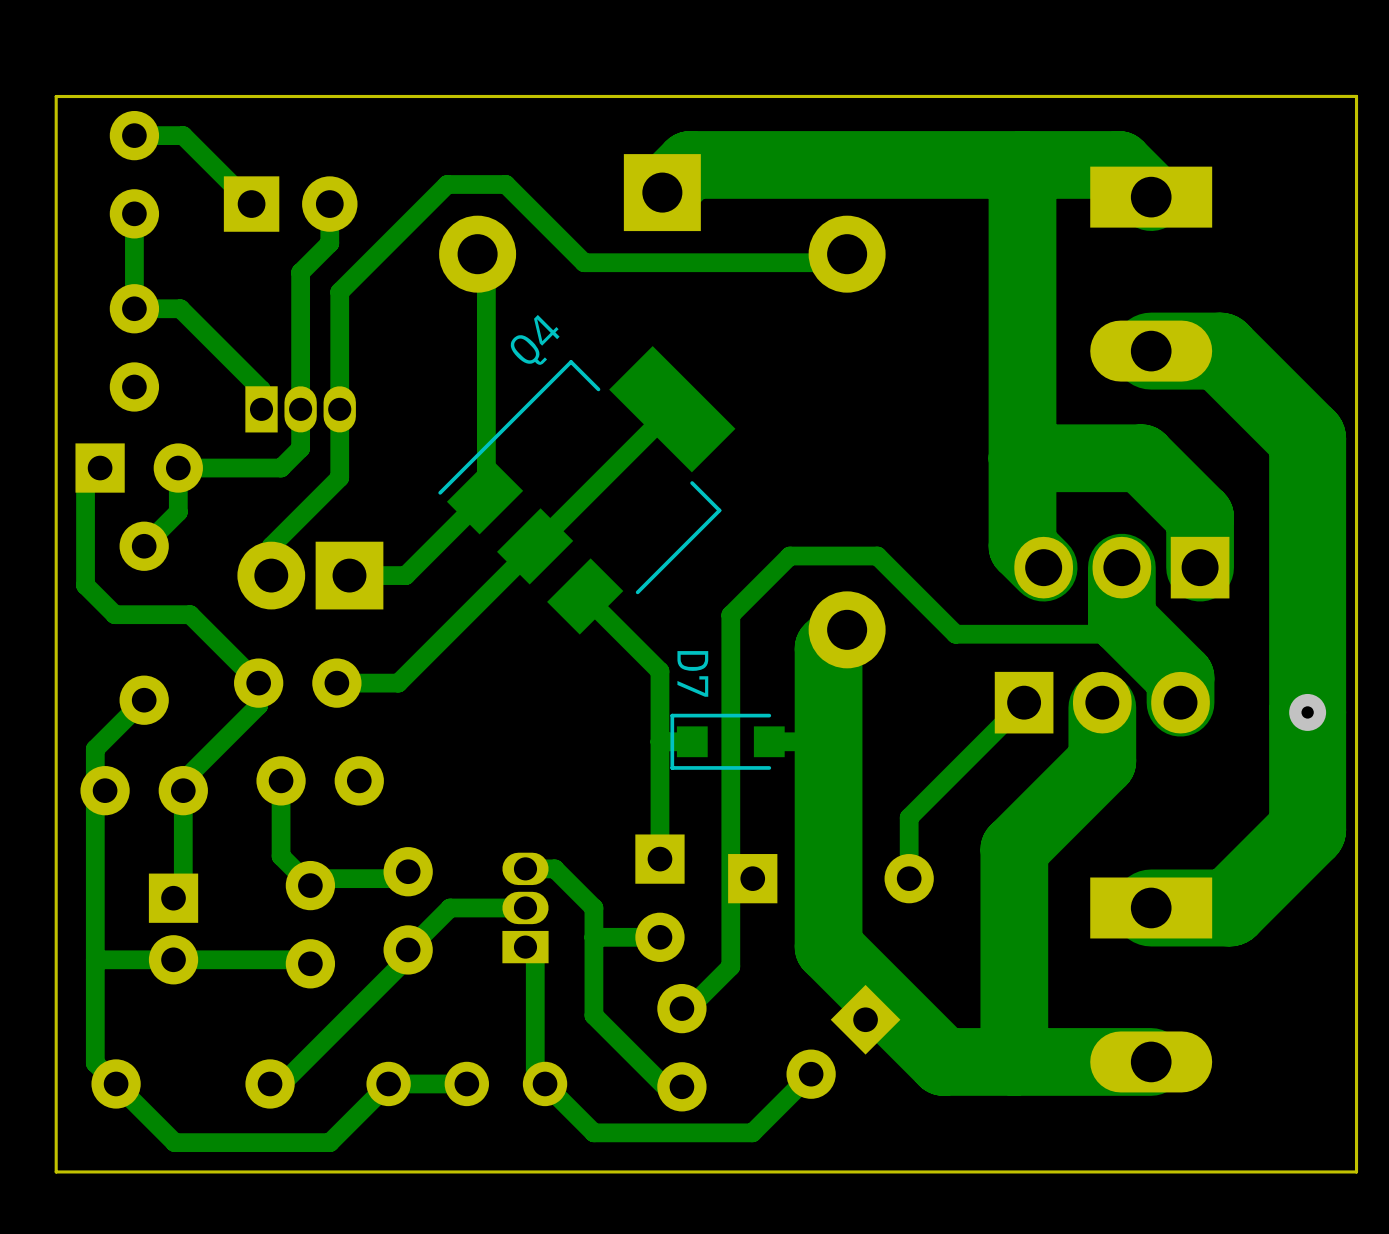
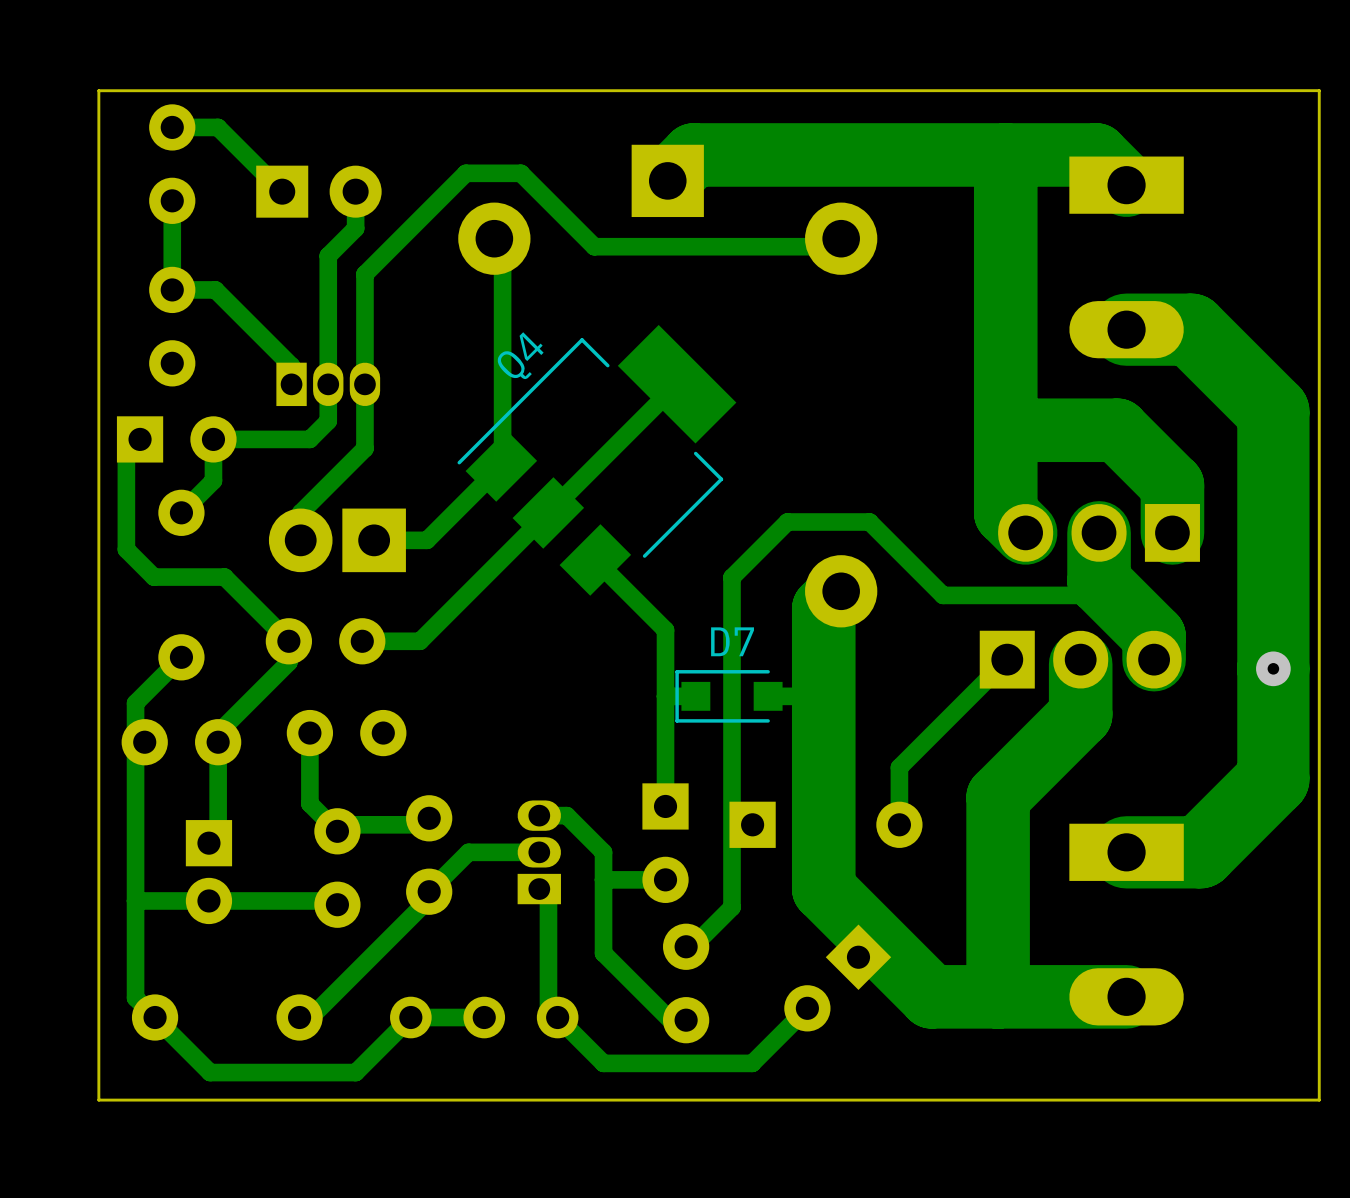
Q4 name position: Q4 (535, 339) -> Q4 (520, 355)
D7 name rotation: 0° (692, 673) -> 90° counterclockwise (732, 641)

